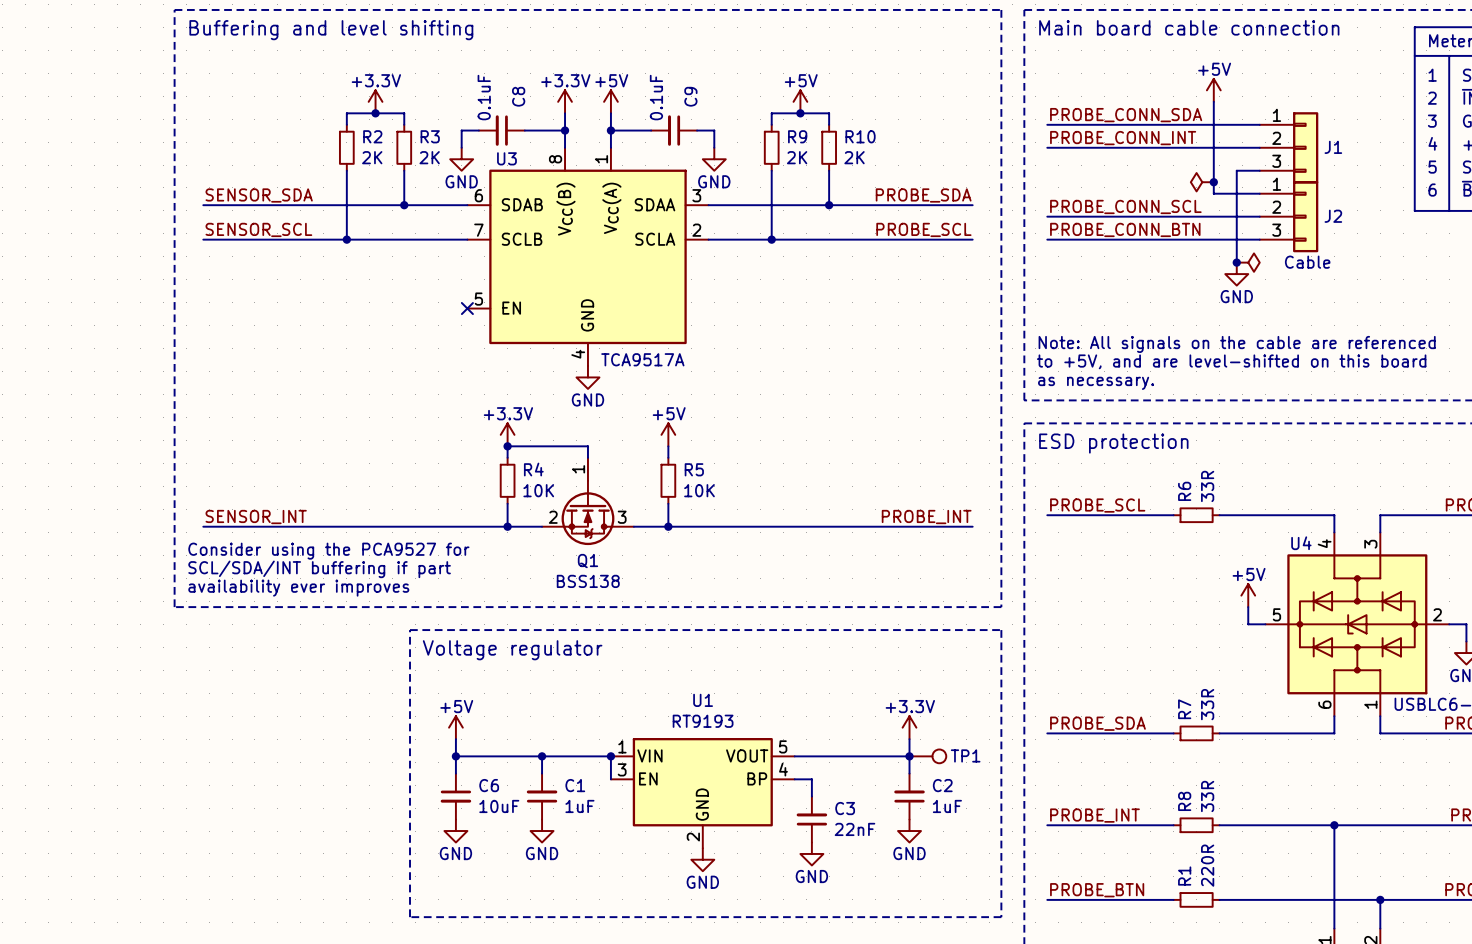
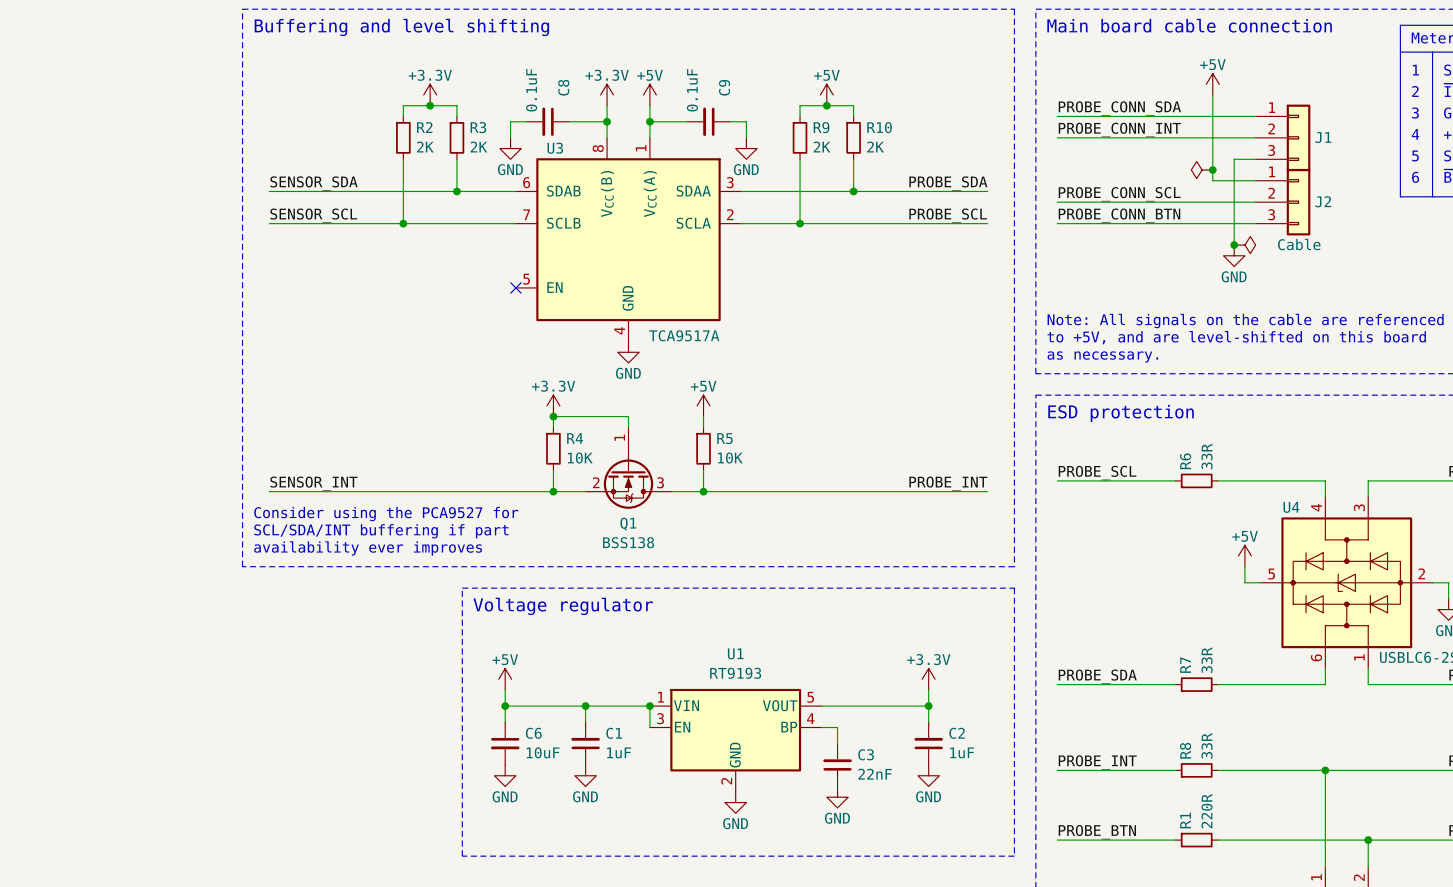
TP1: (927, 756) -> none

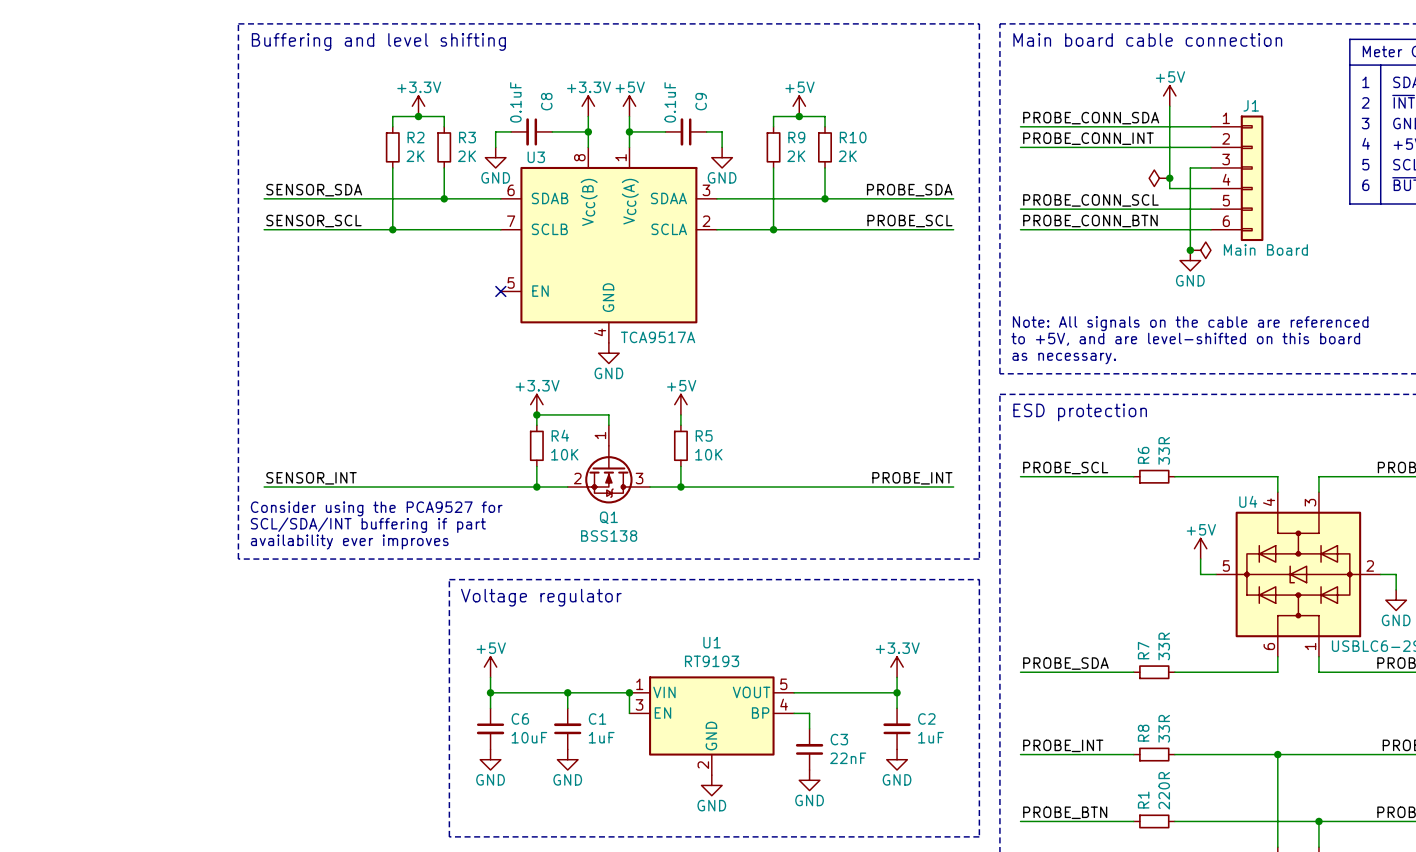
J1 symbol: [1255, 104, 1311, 172] -> [1210, 115, 1264, 242]
J1 name position: J1 (1323, 137) -> J1 (1251, 105)
J2: Cable (1283, 202) -> none
J1 value: none -> Main Board (1265, 249)

